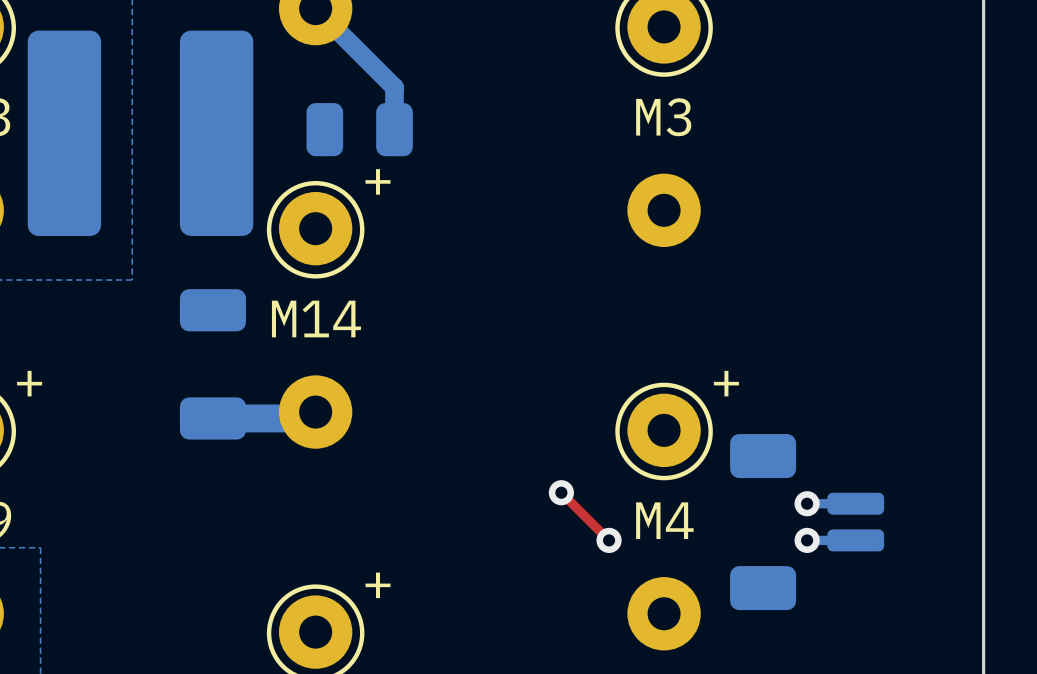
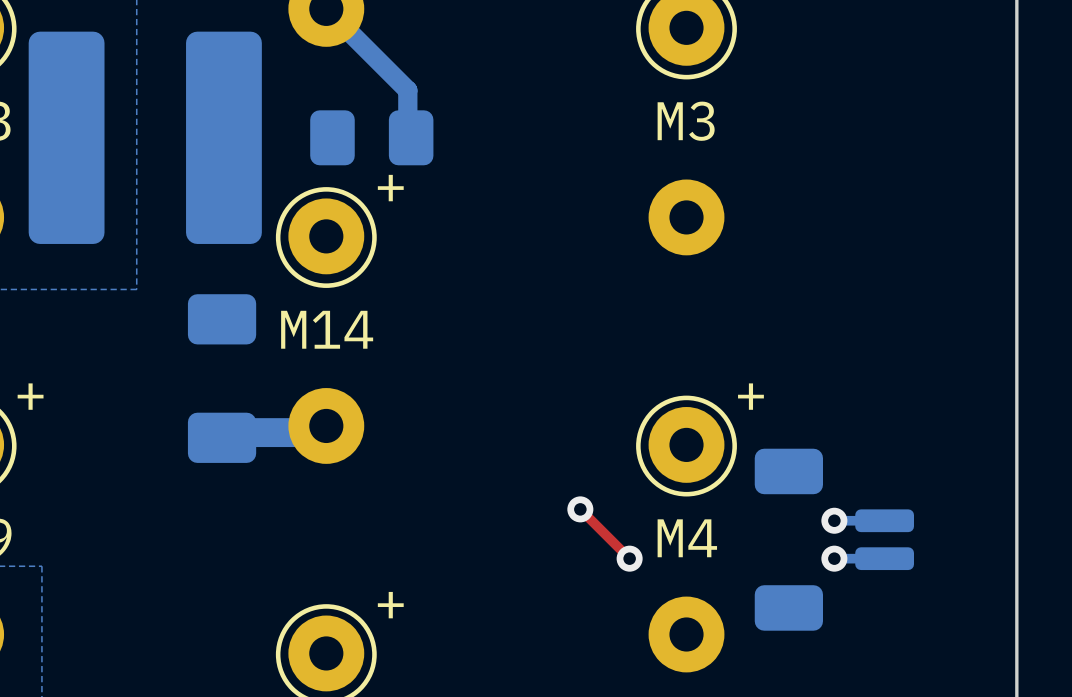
part footprint: [306, 103, 413, 157] -> [310, 110, 434, 166]
part footprint: [179, 289, 246, 440] -> [187, 294, 257, 463]

